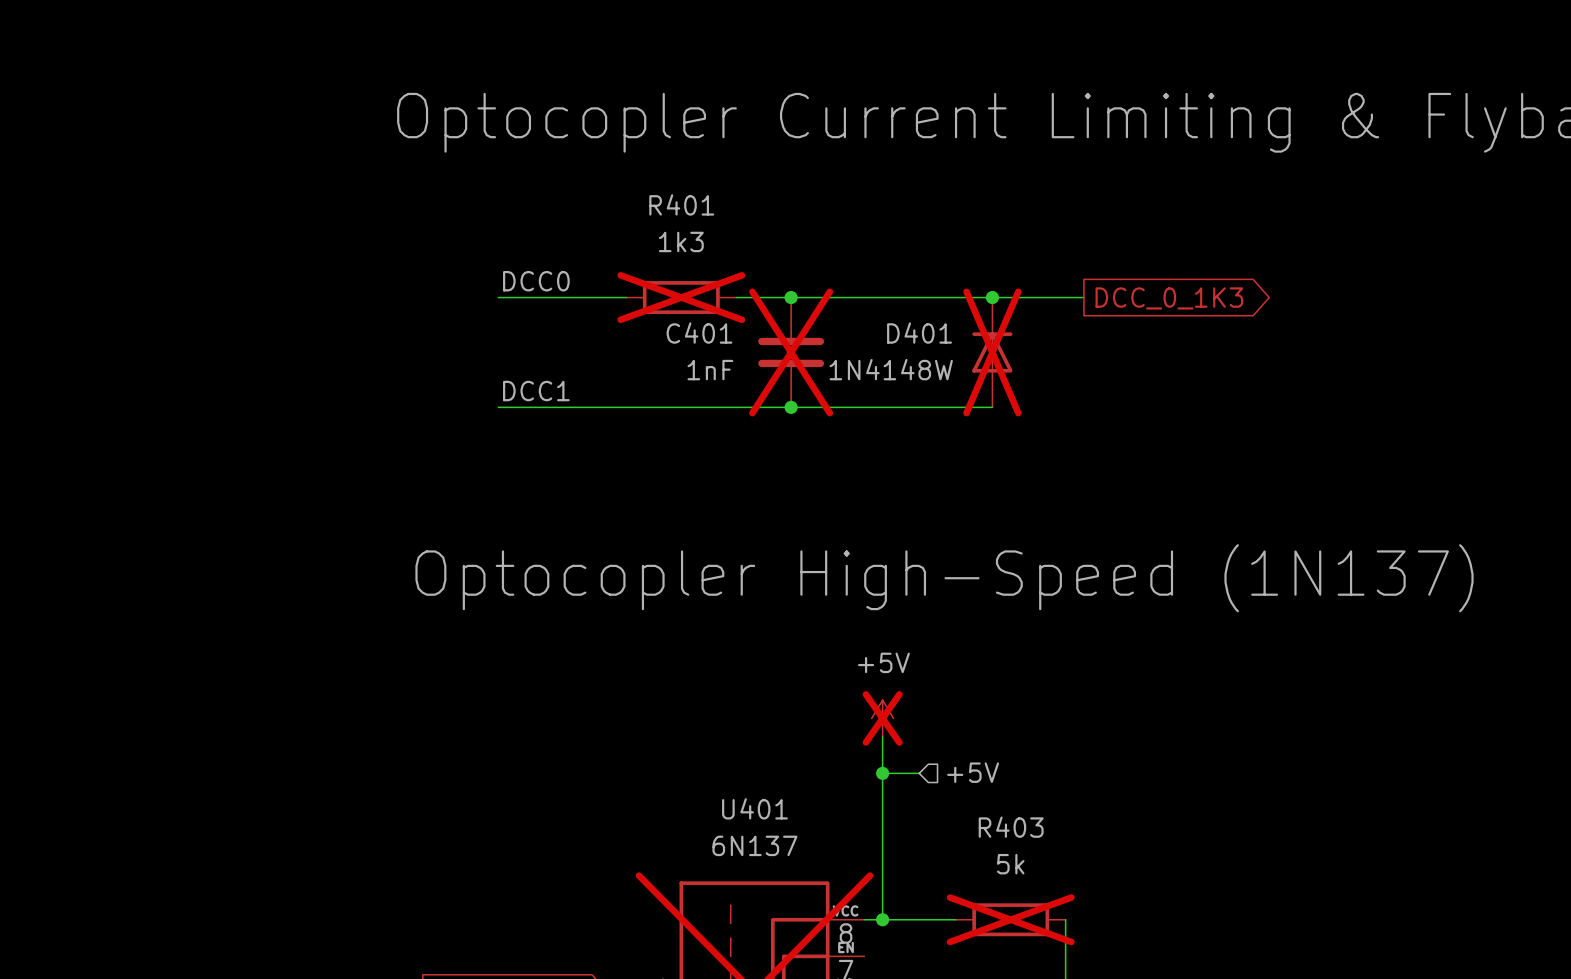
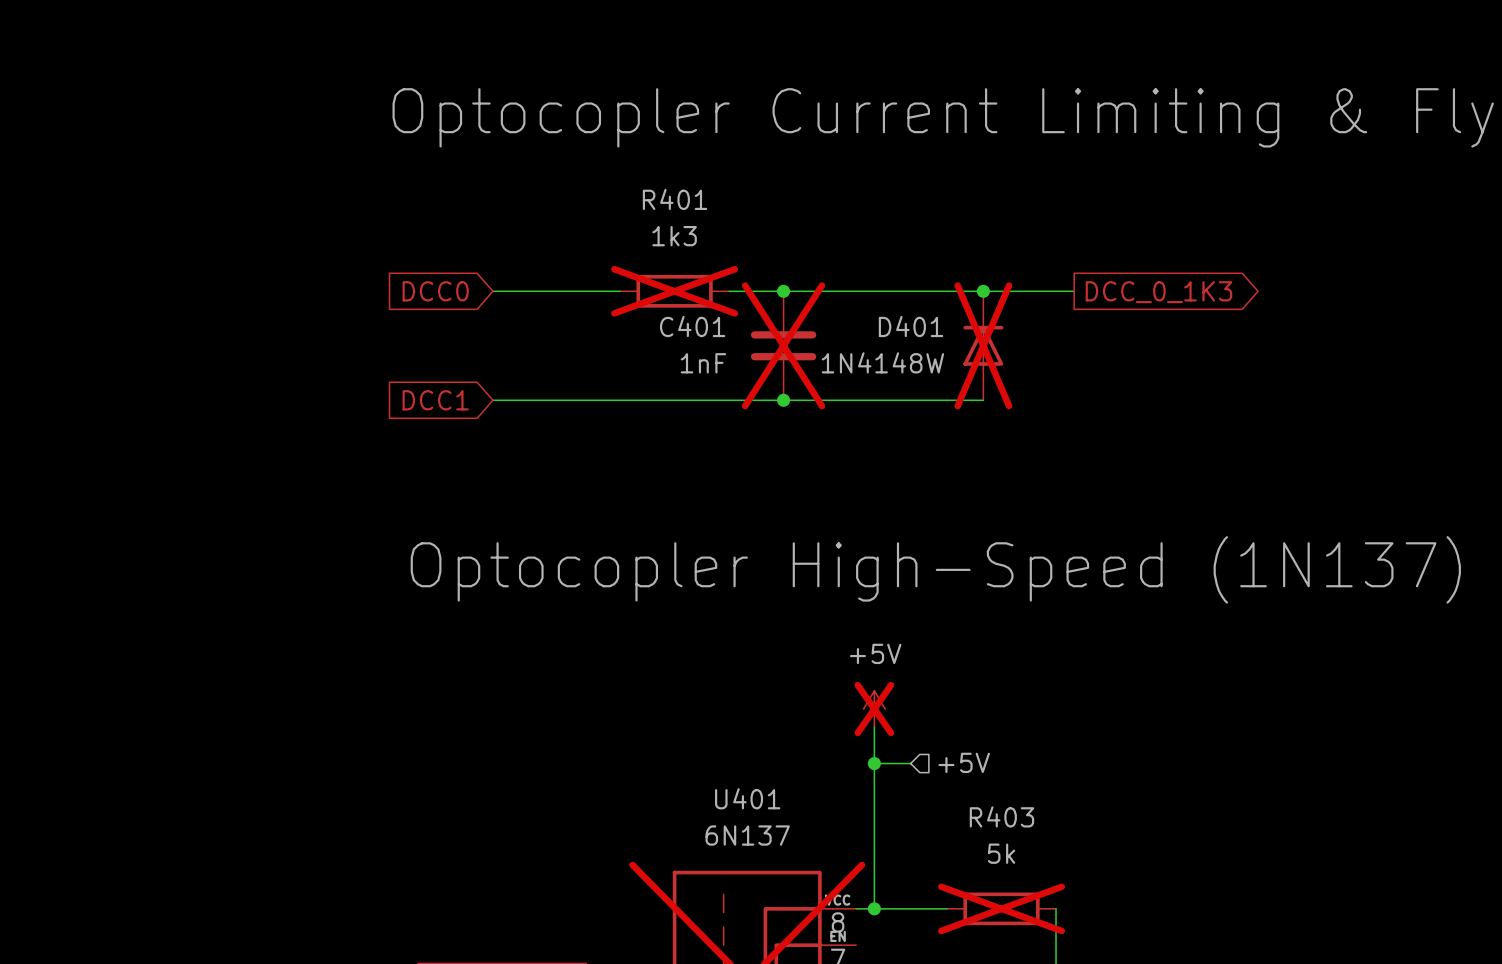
label: DCC0 (536, 281) -> none
global label: none -> DCC0 (435, 291)
label: DCC1 (536, 391) -> none
global label: none -> DCC1 (435, 400)

